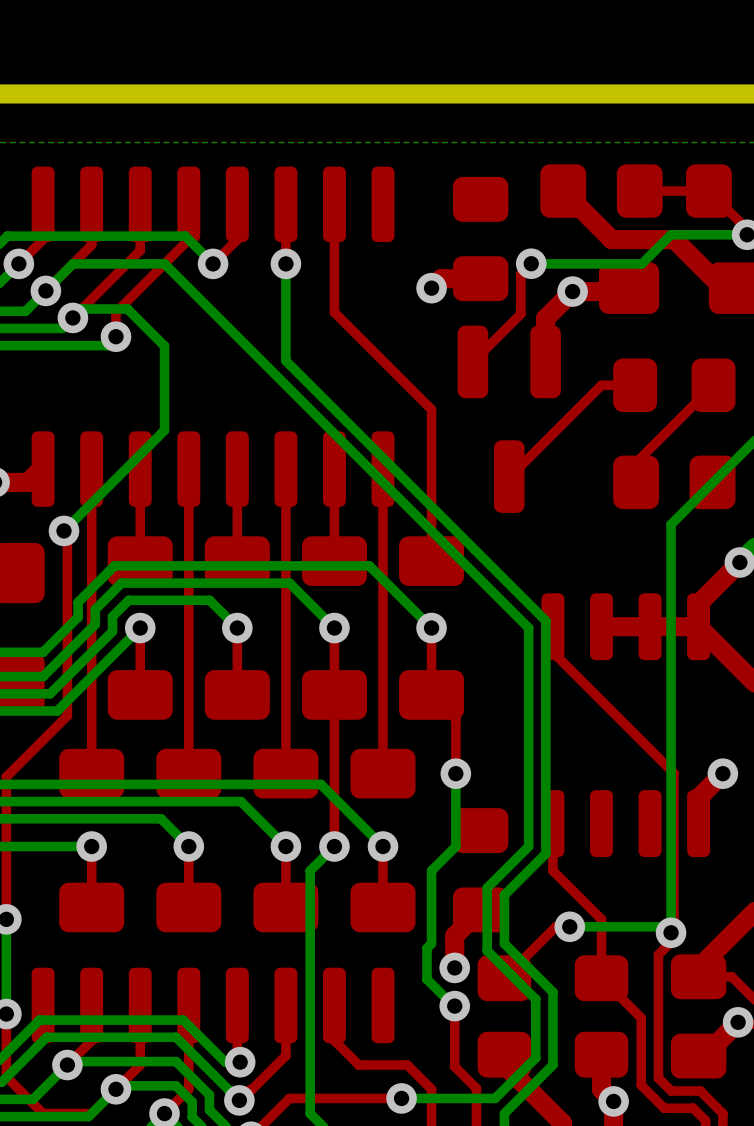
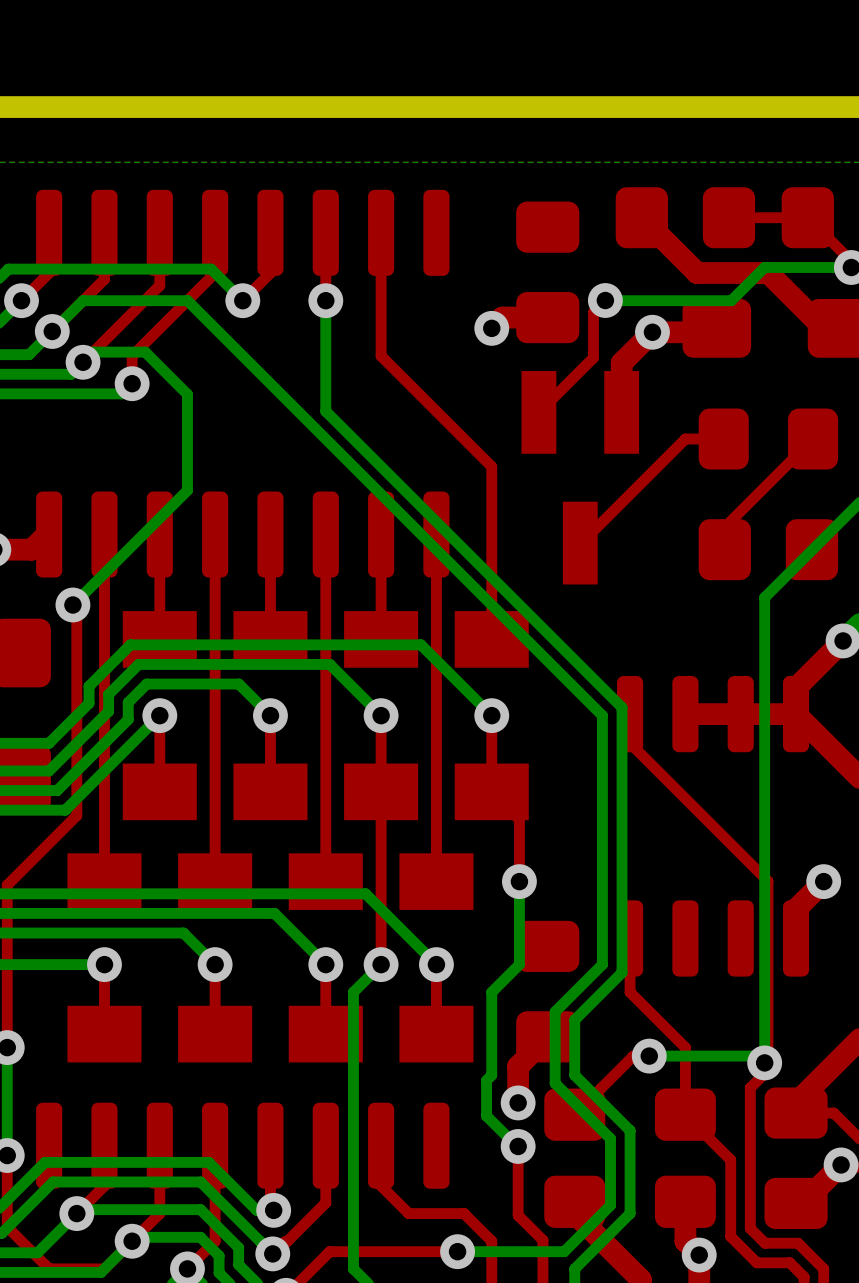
part footprint: [457, 325, 561, 513] -> [521, 371, 640, 585]
part footprint: [107, 536, 173, 720] -> [122, 611, 197, 821]
part footprint: [204, 536, 270, 720] -> [233, 611, 308, 821]
part footprint: [301, 536, 367, 720] -> [344, 611, 419, 821]
part footprint: [399, 536, 465, 720] -> [454, 611, 529, 821]
part footprint: [59, 748, 125, 933] -> [67, 853, 142, 1063]
part footprint: [156, 748, 222, 933] -> [178, 853, 253, 1063]
part footprint: [253, 748, 319, 933] -> [288, 853, 363, 1063]
part footprint: [350, 748, 416, 933] -> [399, 853, 474, 1063]

